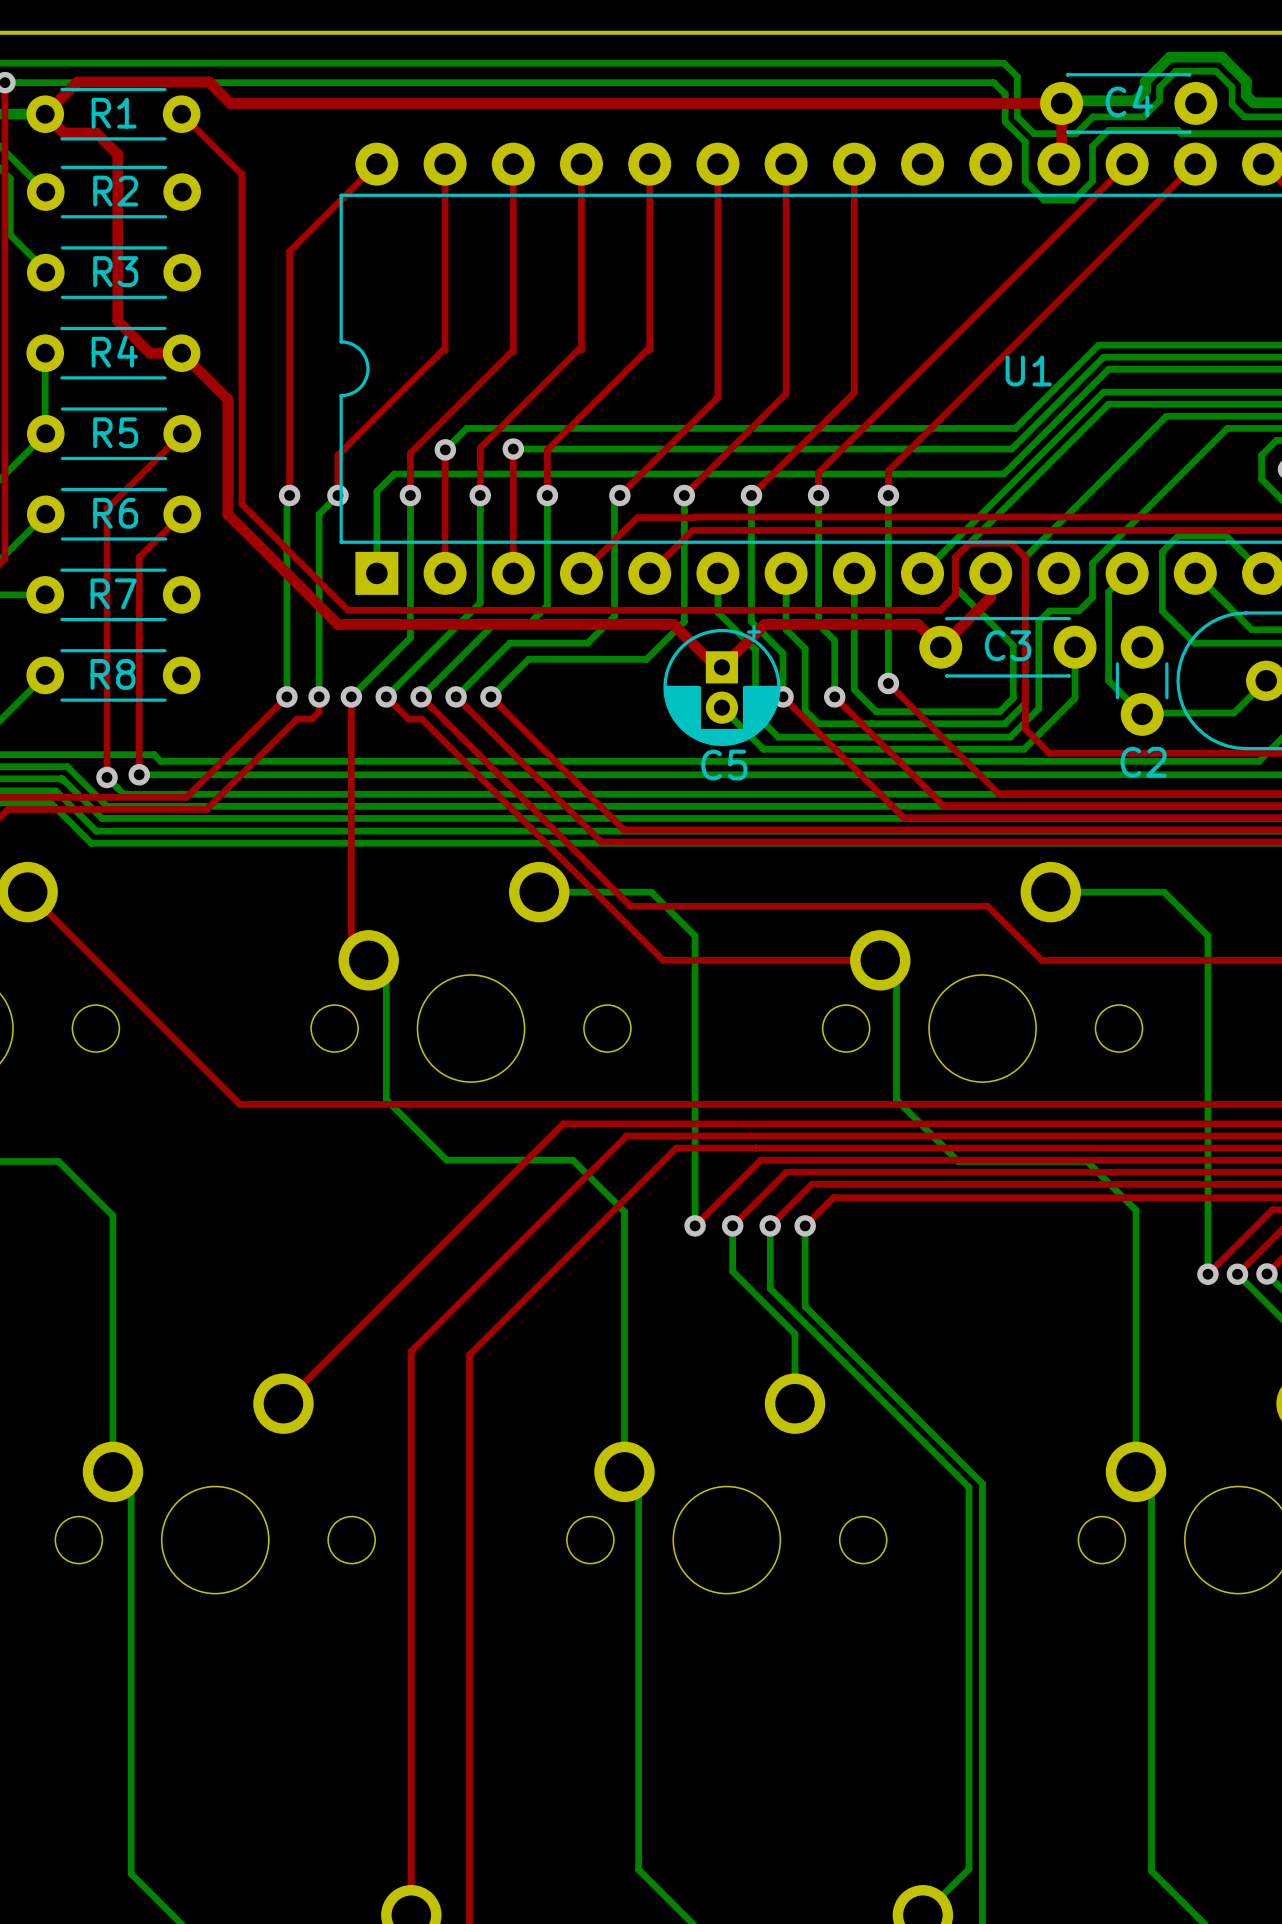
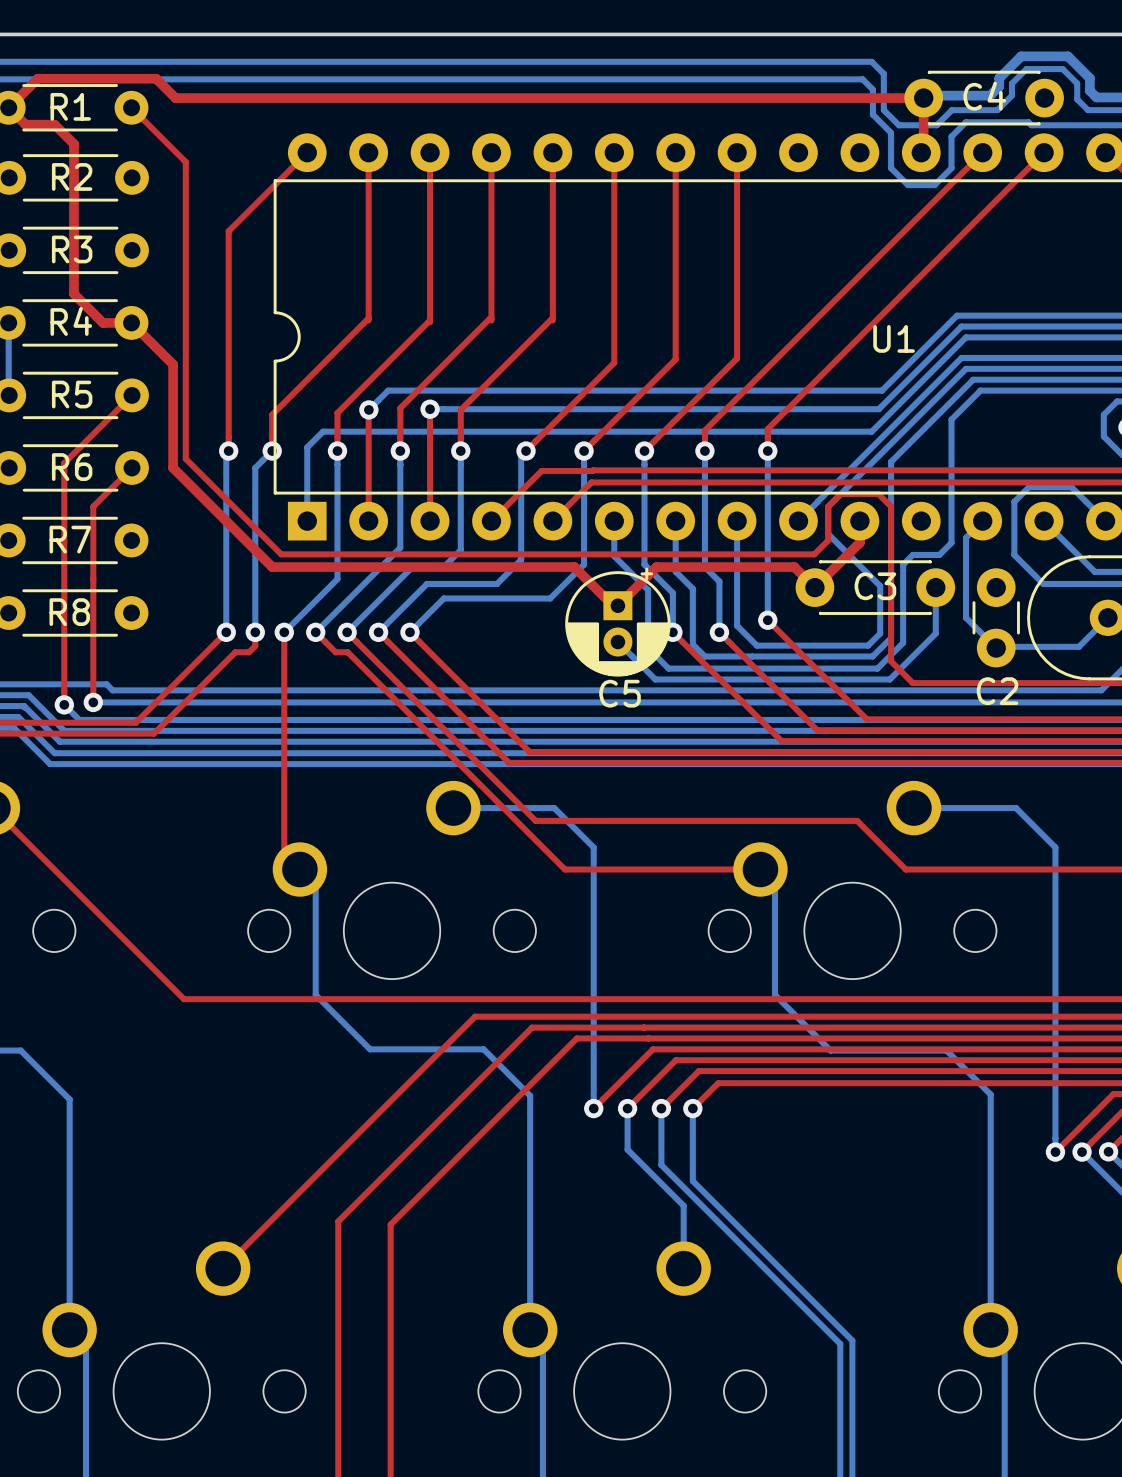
bottom track: (1166, 416) (1025, 557) -> (1017, 379) (973, 379) (891, 461) (891, 506)
bottom track: (1227, 428) (1092, 563) -> (1072, 390) (980, 390) (951, 419) (951, 512)

